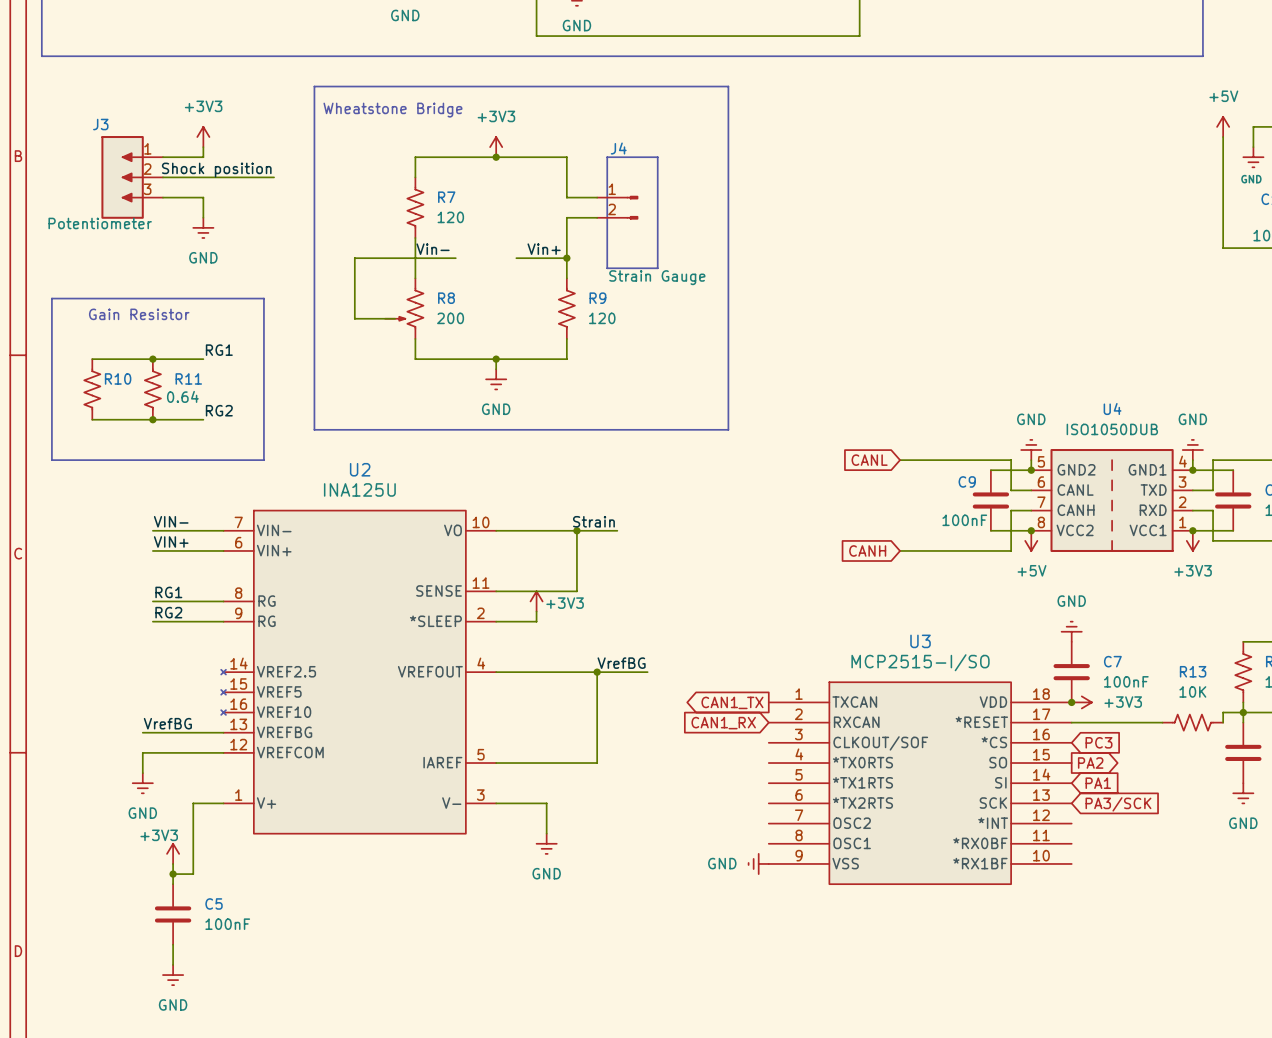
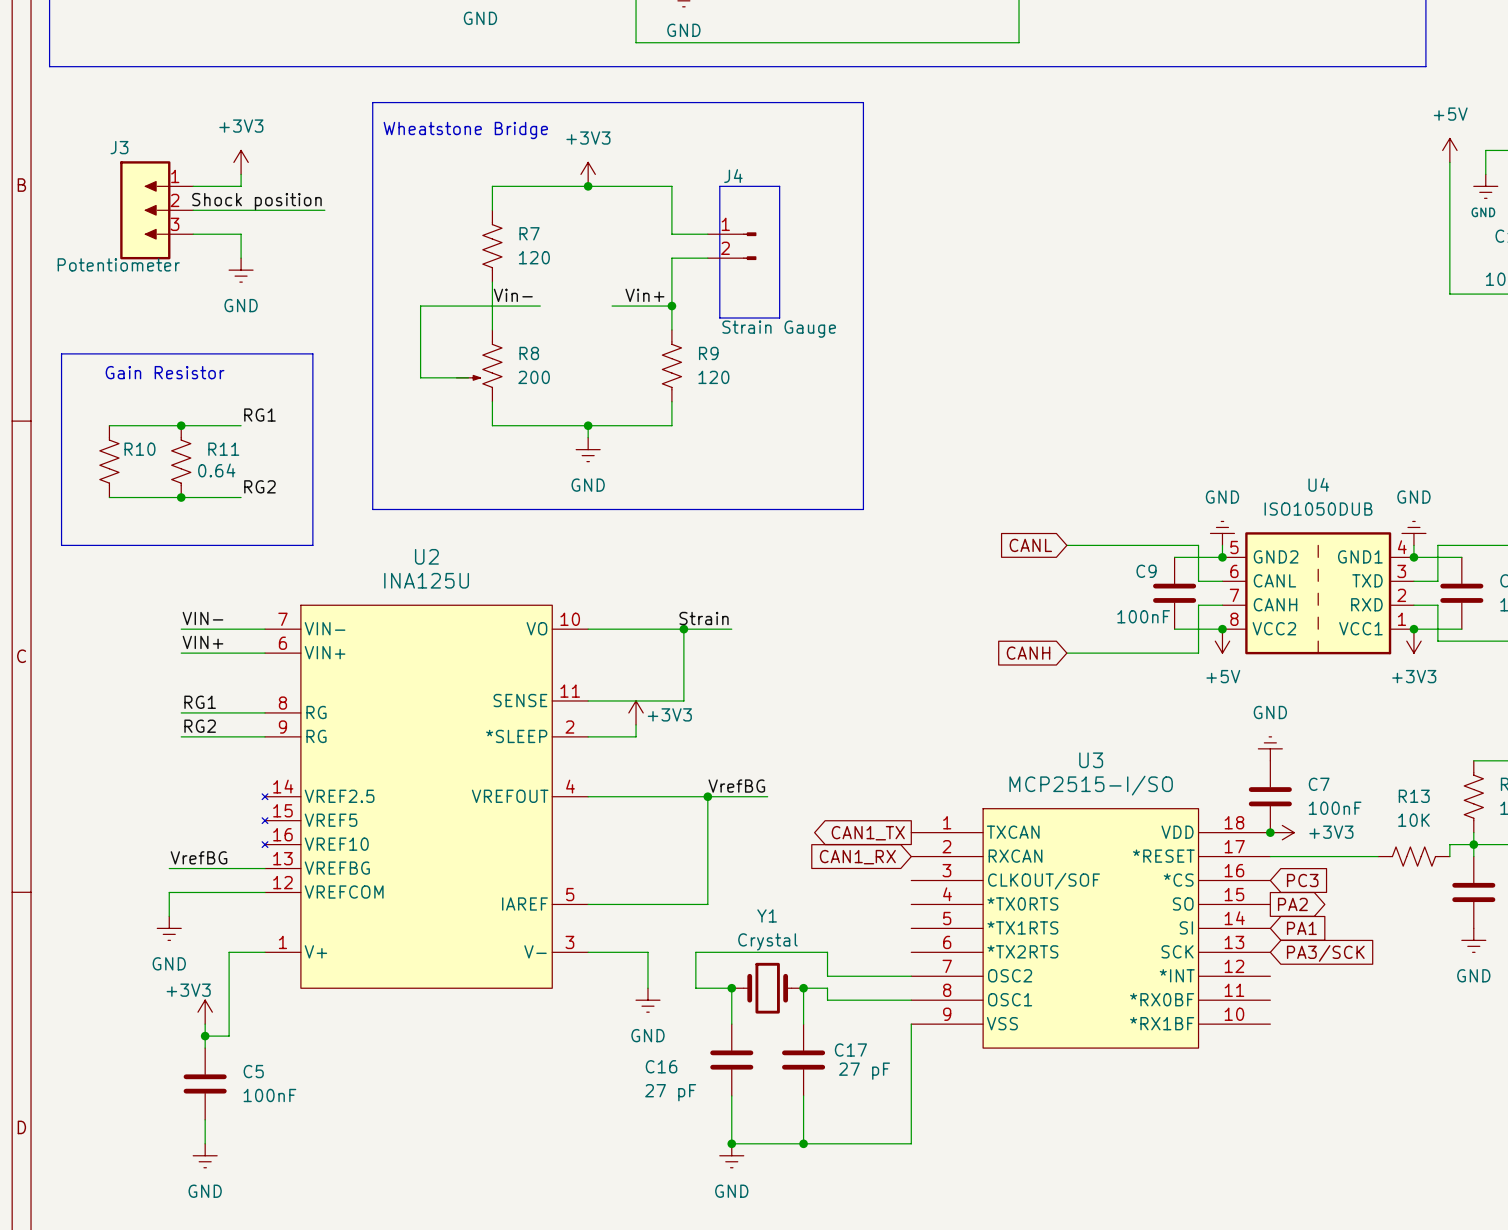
wire: none -> (911, 976) (827, 976) (827, 952) (695, 952) (695, 988) (731, 988) (731, 1024)
junction: none -> (731, 988)
Y1: none -> Crystal (767, 988)
junction: none -> (803, 988)
wire: none -> (911, 1000) (827, 1000) (827, 988) (803, 988) (803, 1024)
power symbol rotation: 0° (758, 863) -> 90° counterclockwise (731, 1155)
power symbol position: GND (758, 863) -> GND (731, 1155)
wire: none -> (911, 1024) (911, 1143) (731, 1143) (731, 1095)
C16: none -> 27 pF (731, 1060)
C17: none -> 27 pF (803, 1060)
wire: none -> (803, 1095) (803, 1143)
junction: none -> (731, 1143)
junction: none -> (803, 1143)

